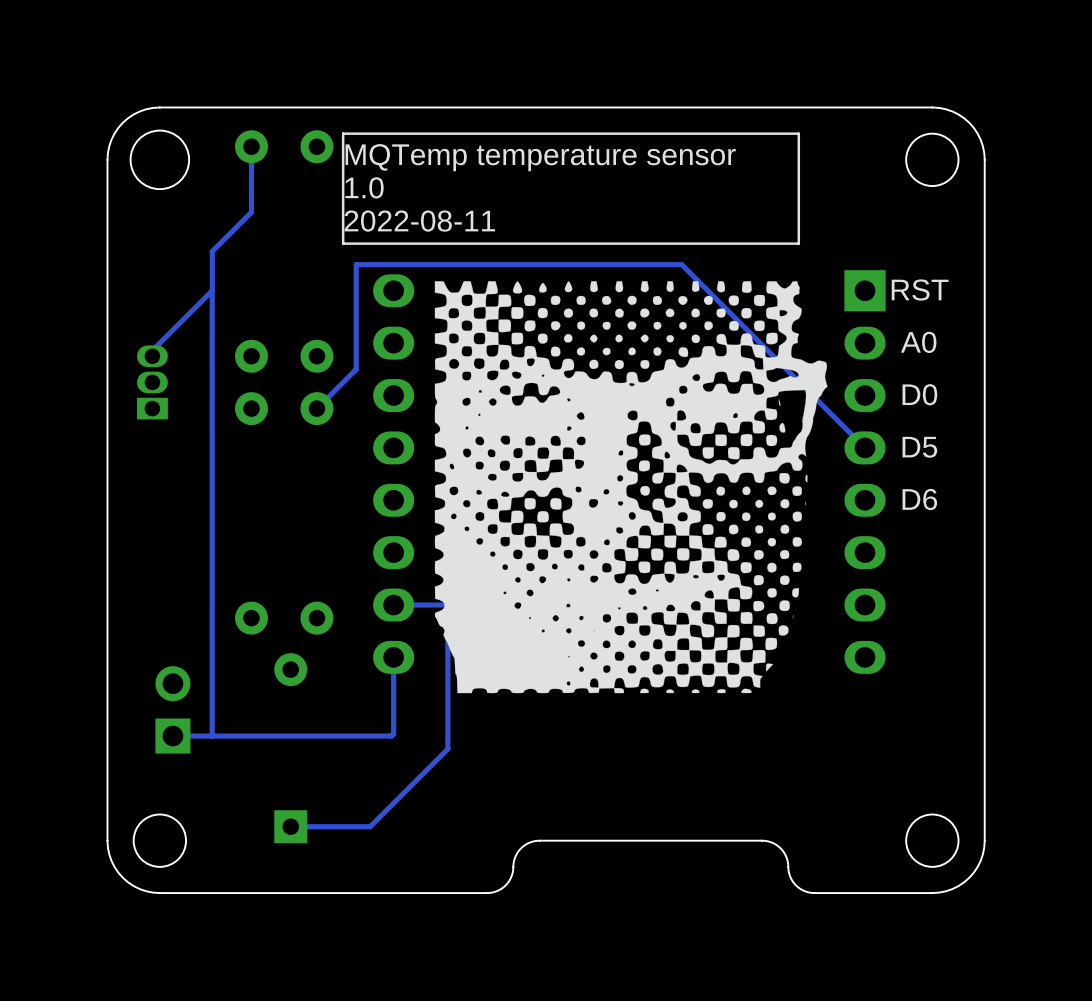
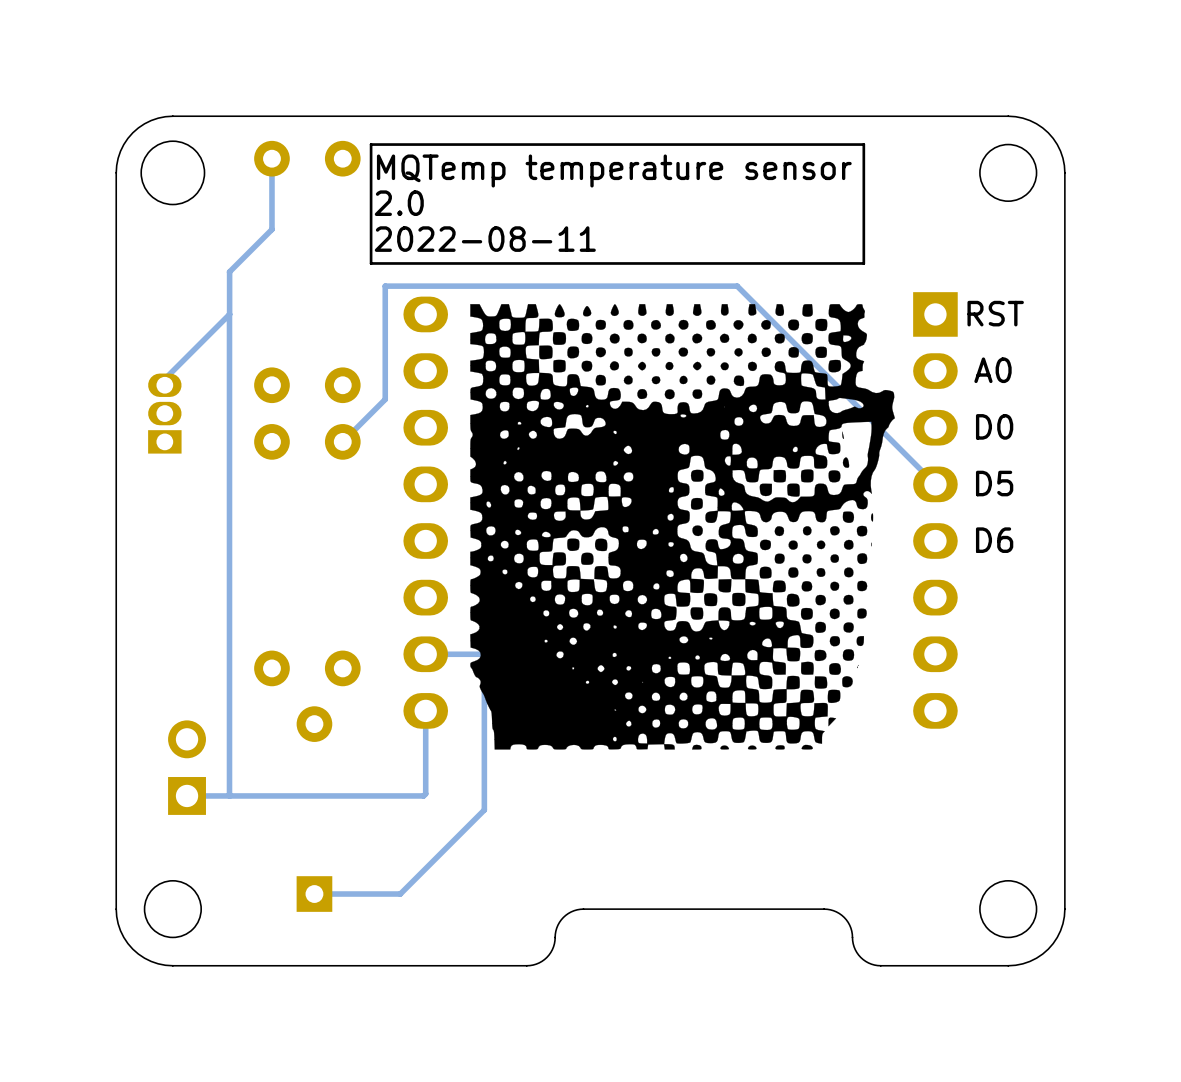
text: 1.0 (364, 187) -> 2.0 (399, 203)

